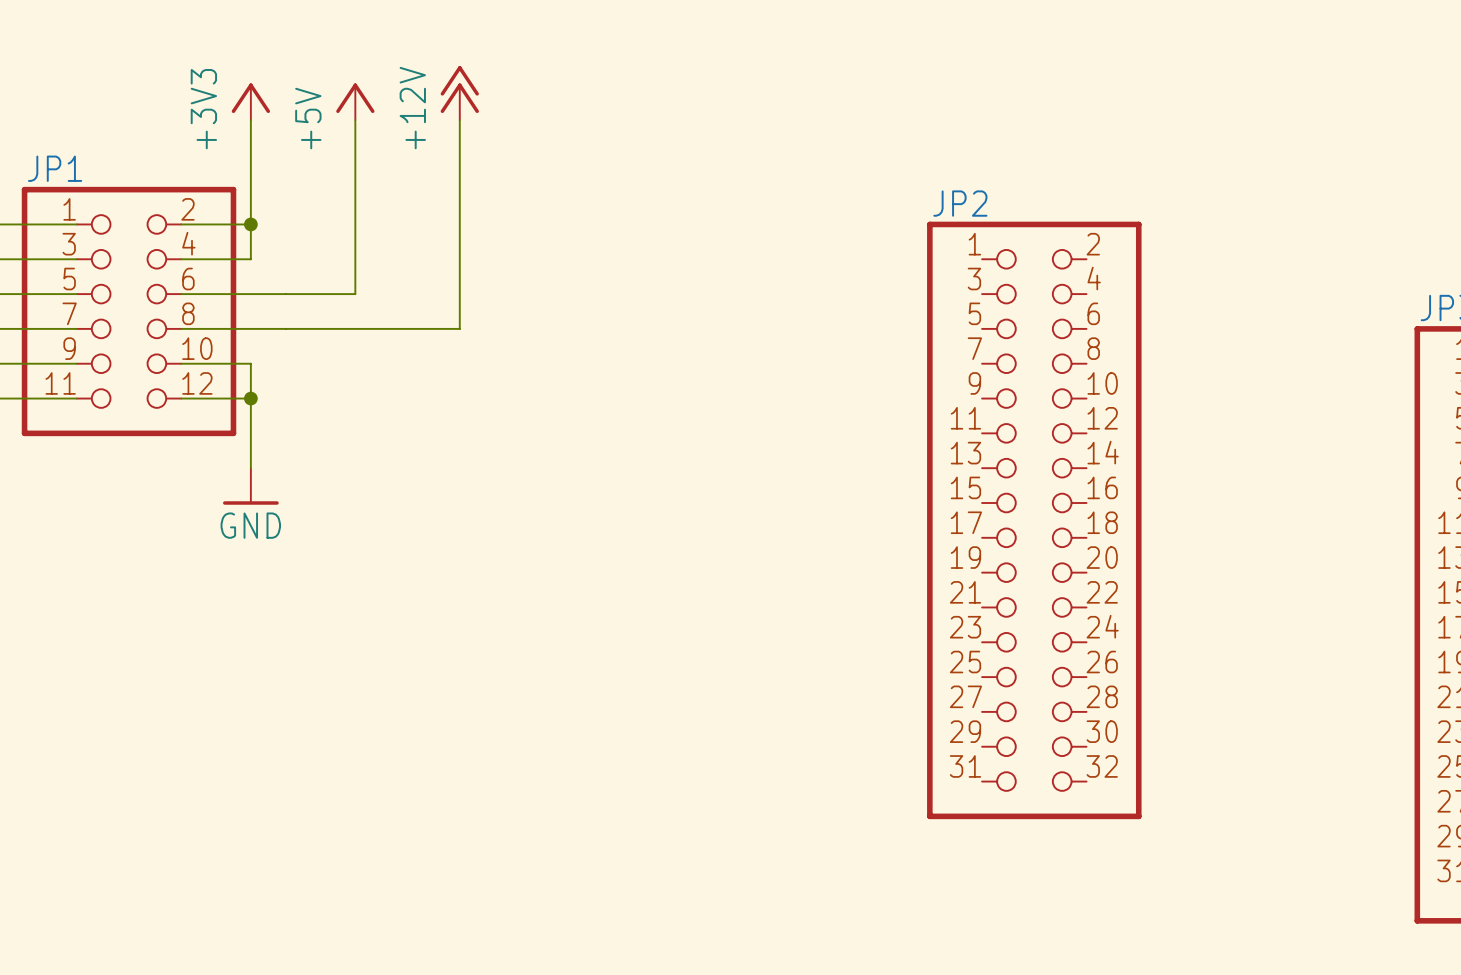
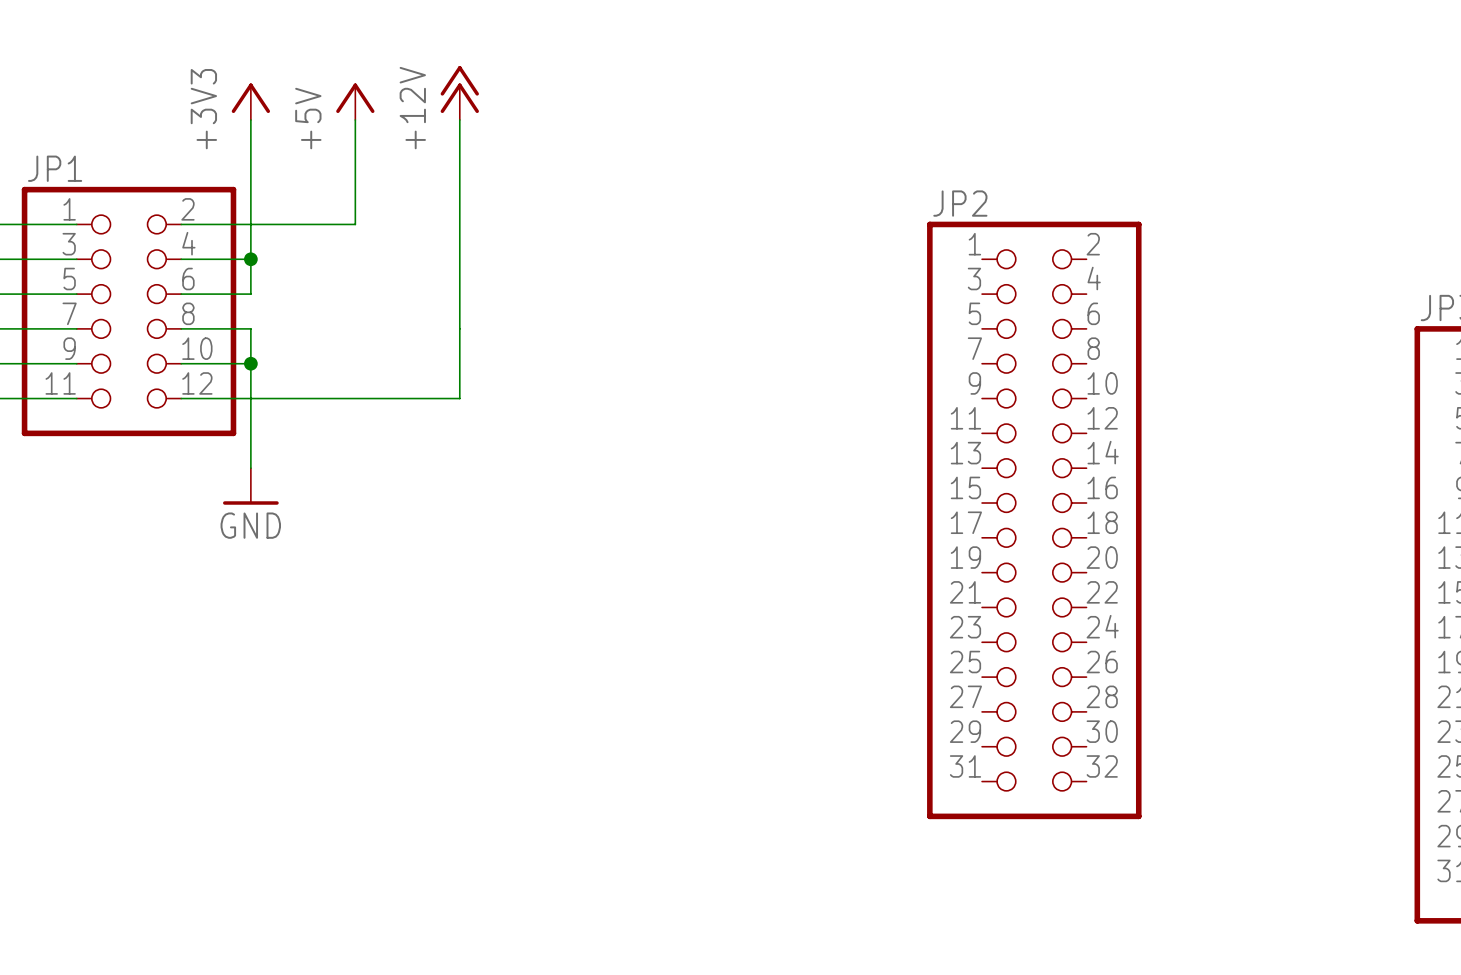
junction position: (250, 224) -> (250, 259)
wire: (355, 224) (355, 294) (250, 294) -> (355, 224) (250, 224)
wire: none -> (250, 259) (250, 294)
wire: (250, 328) (459, 328) -> (250, 398) (459, 398) (459, 328)
wire: none -> (250, 328) (250, 363)
junction position: (250, 398) -> (250, 363)

